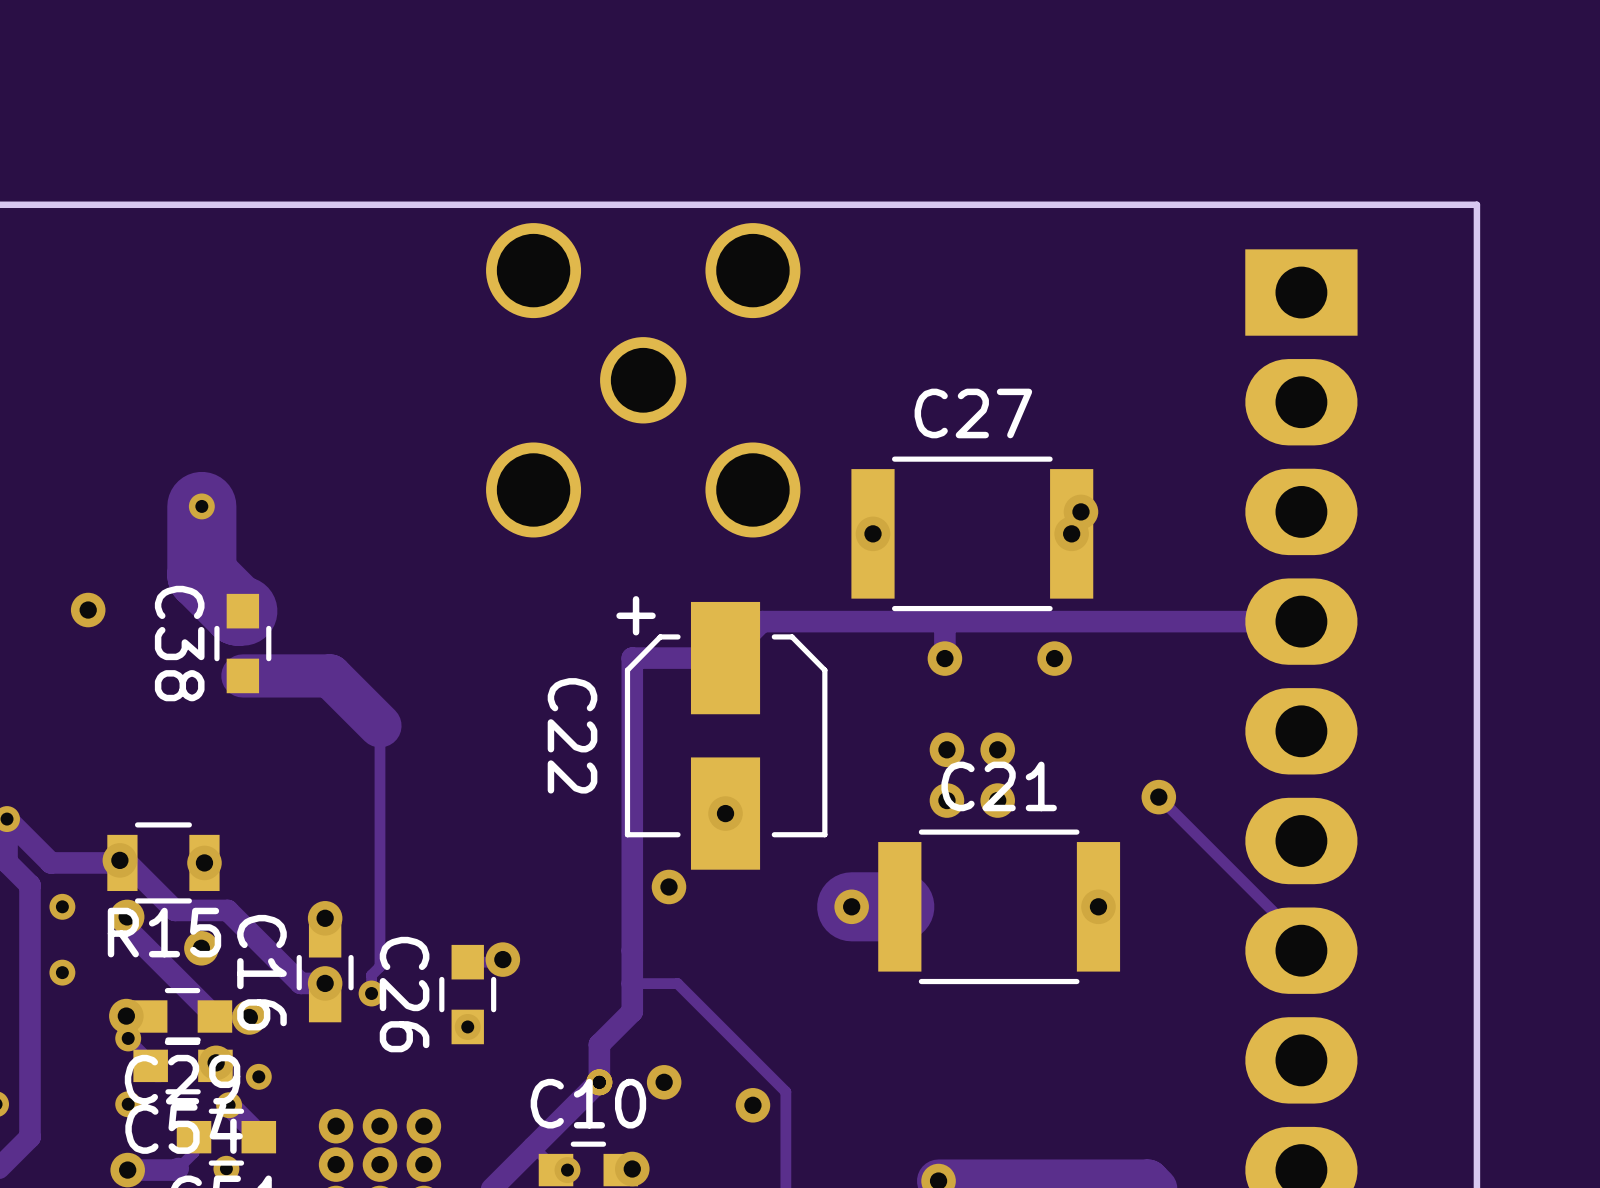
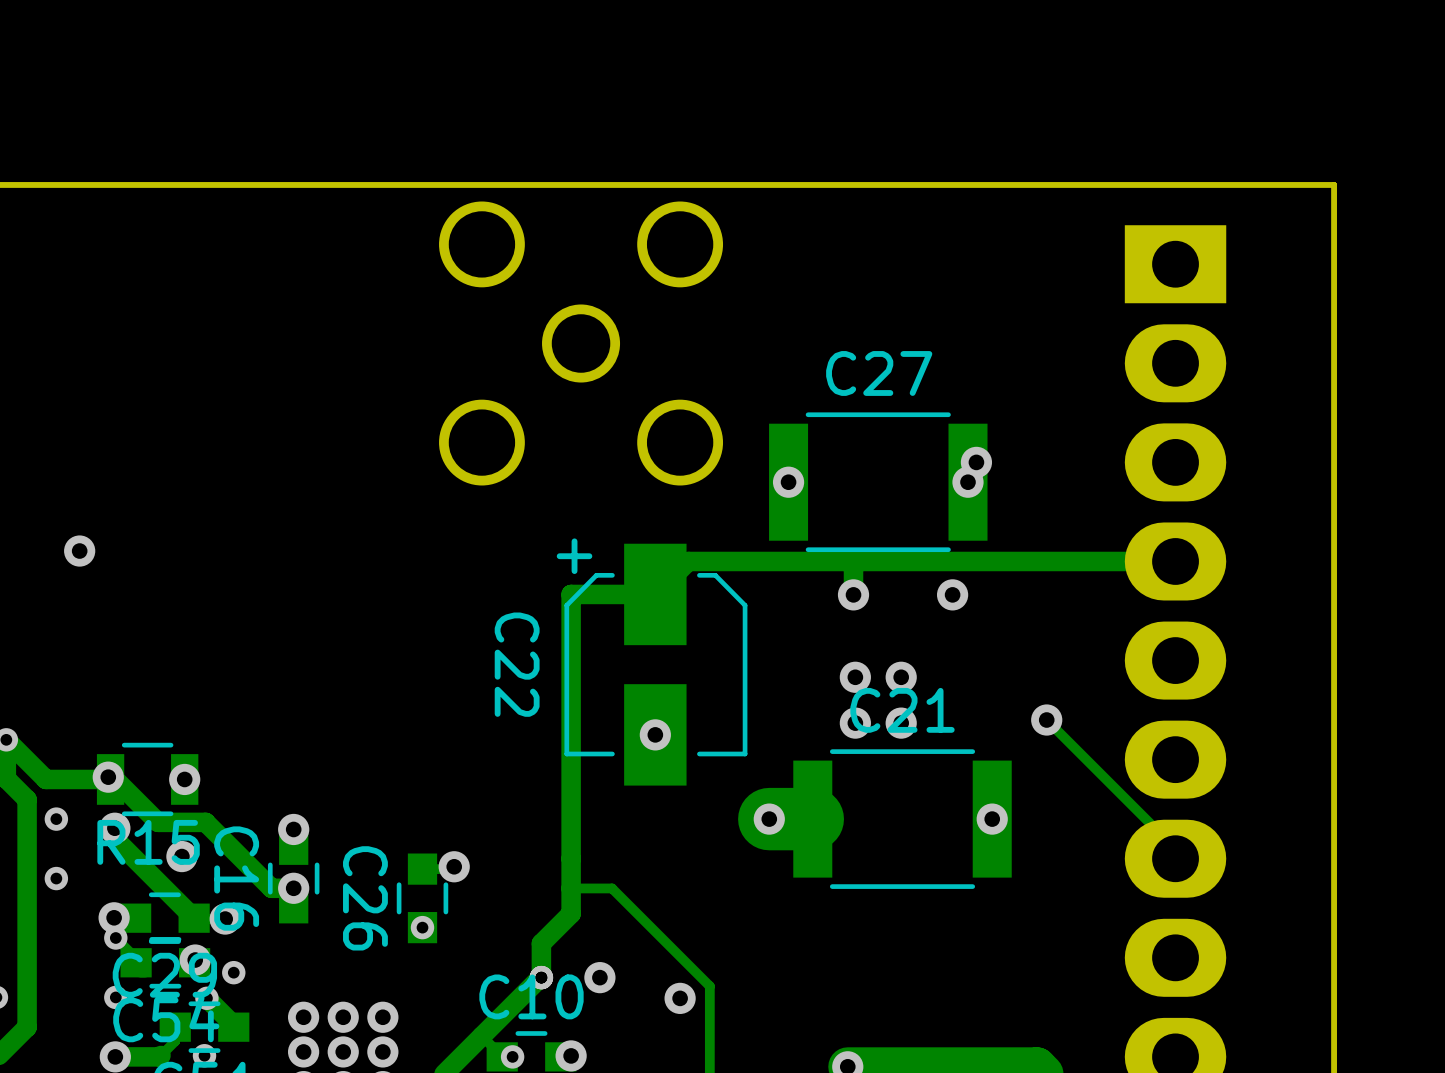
track: (201, 506) (201, 575) (237, 611) (242, 611) -> none
via: (201, 506) -> none
C38: (242, 643) -> none
track: (242, 675) (330, 675) (379, 725) (379, 966) (371, 975) (371, 993) -> none
via: (668, 886) -> none
via: (371, 993) -> none

